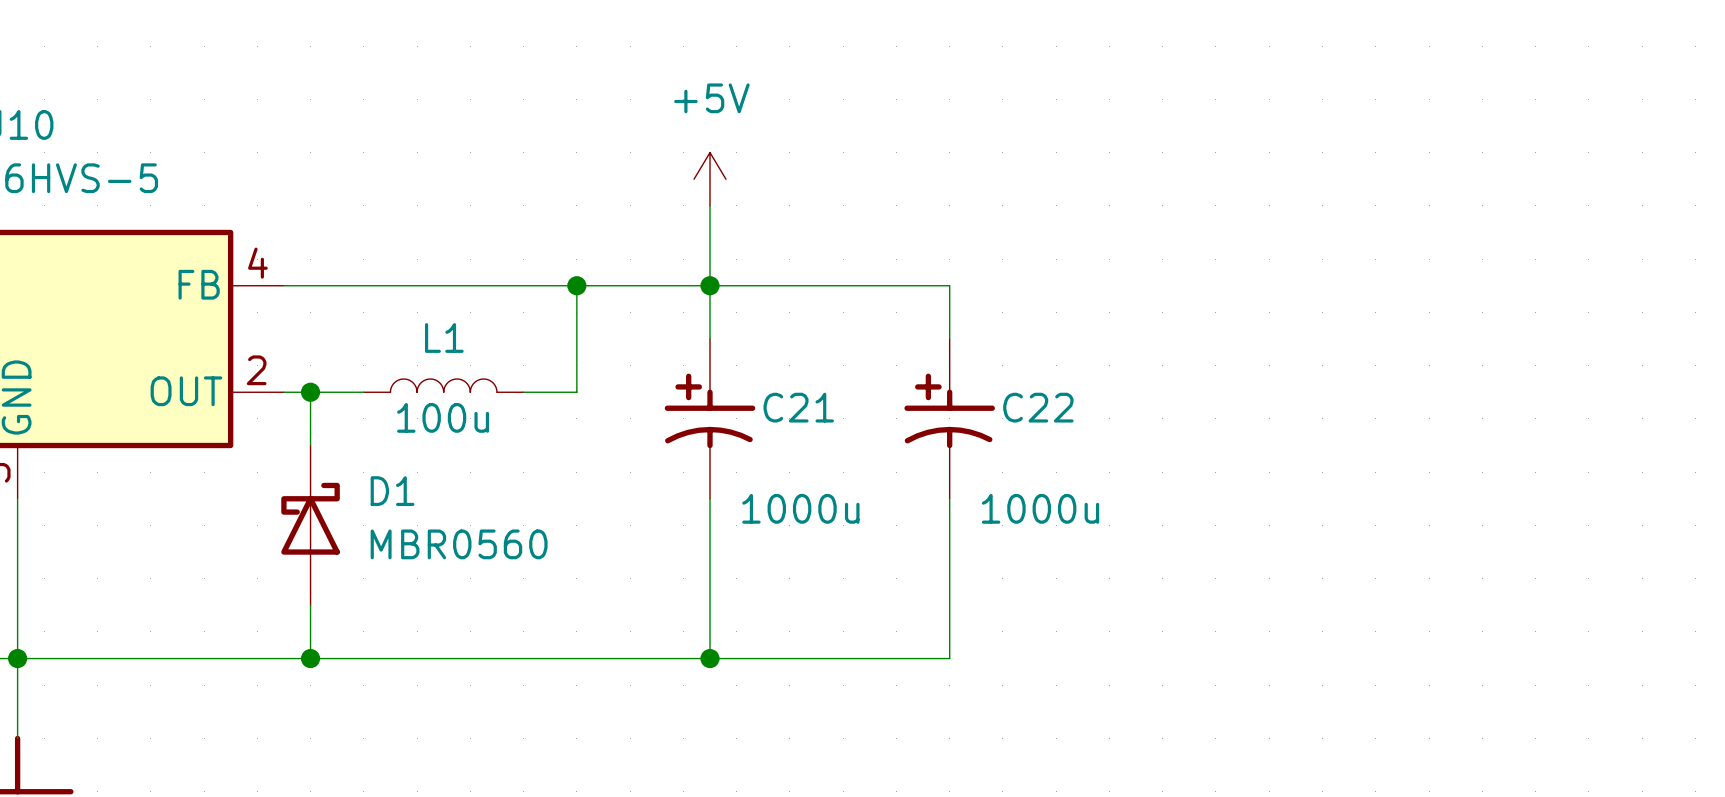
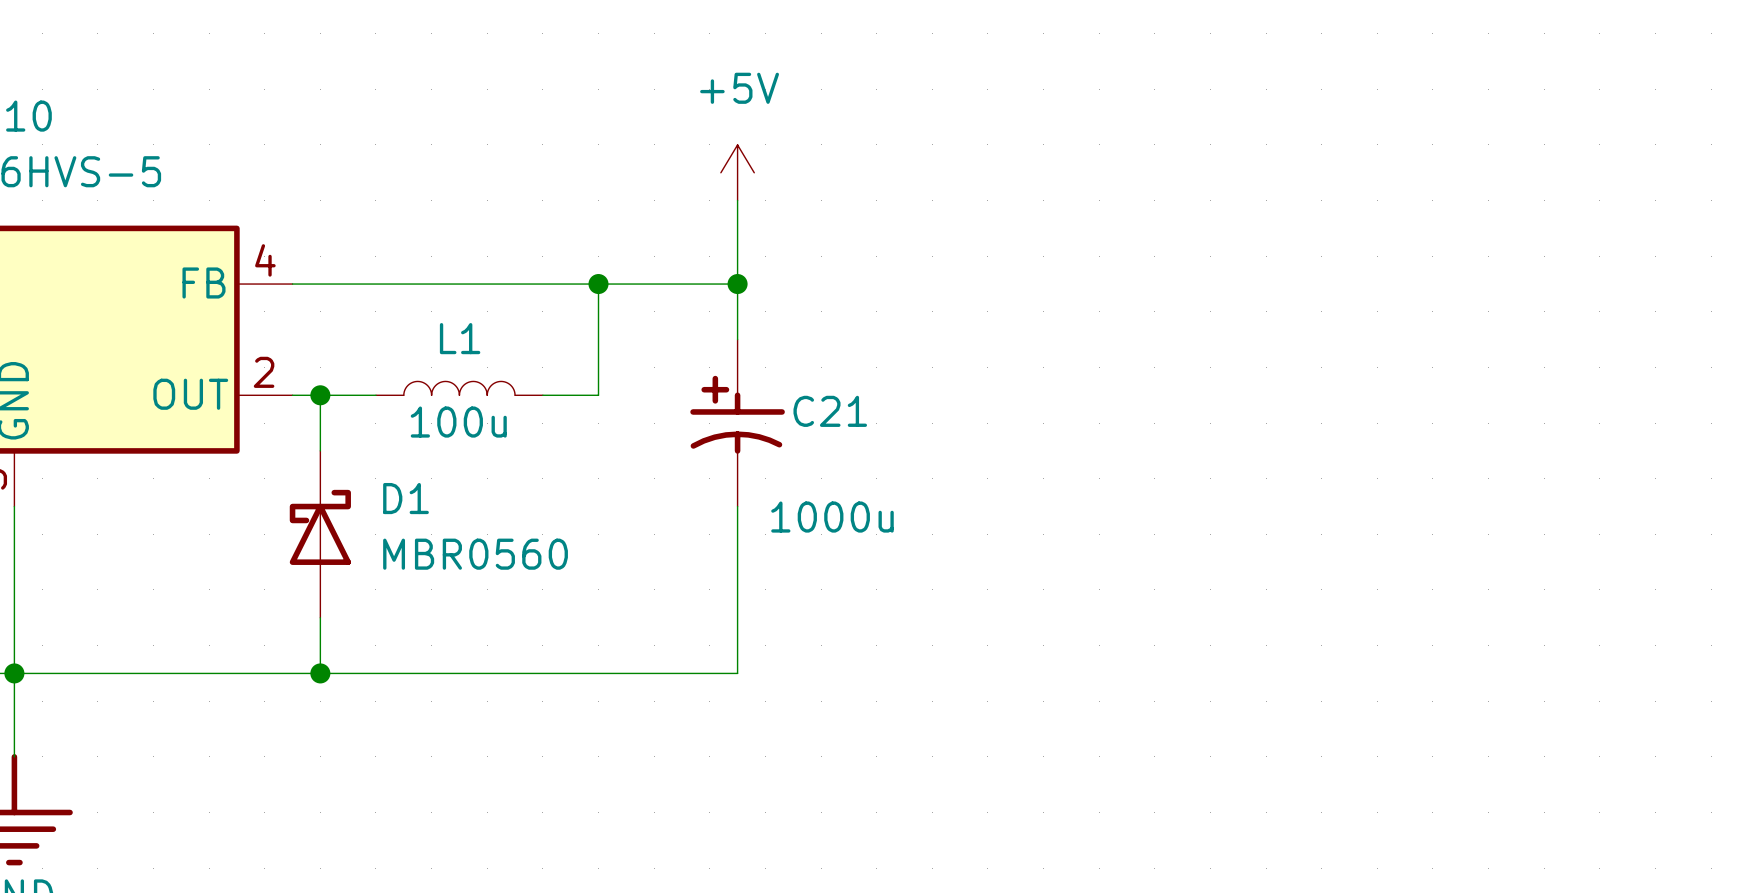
wire: (710, 285) (949, 285) (949, 338) -> none
C22: 1000u (949, 418) -> none
wire: (949, 498) (949, 658) (710, 658) -> none
junction: (710, 658) -> none

